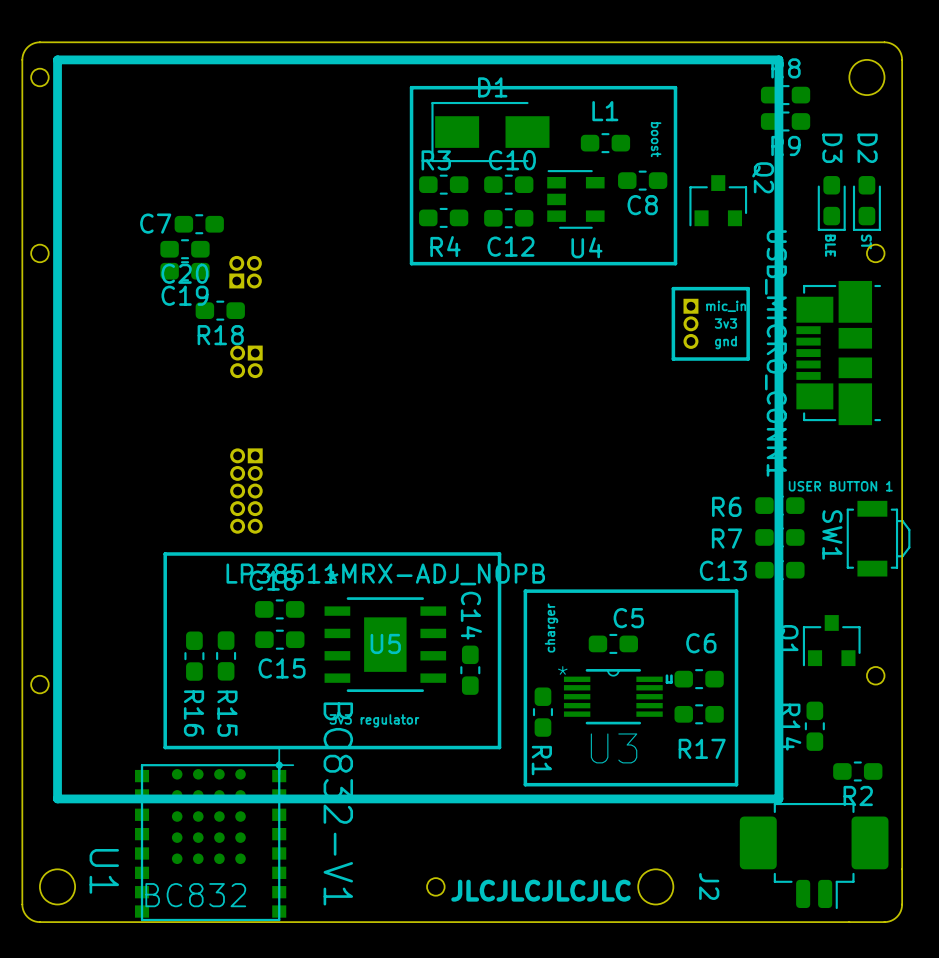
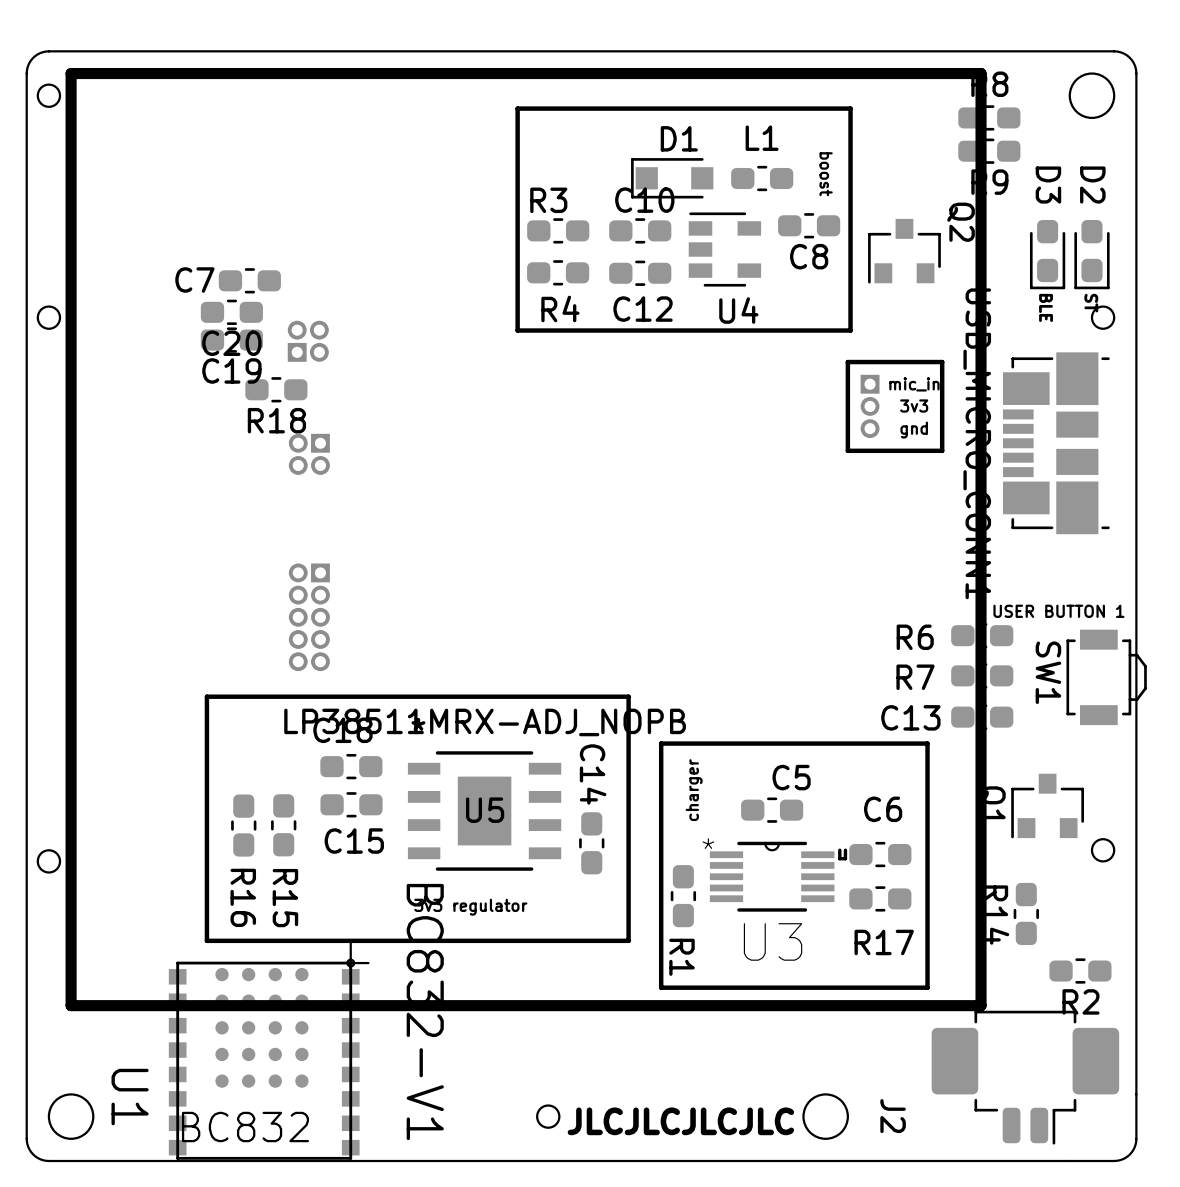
D1 footprint: [431, 101, 550, 163] -> [631, 158, 714, 199]

